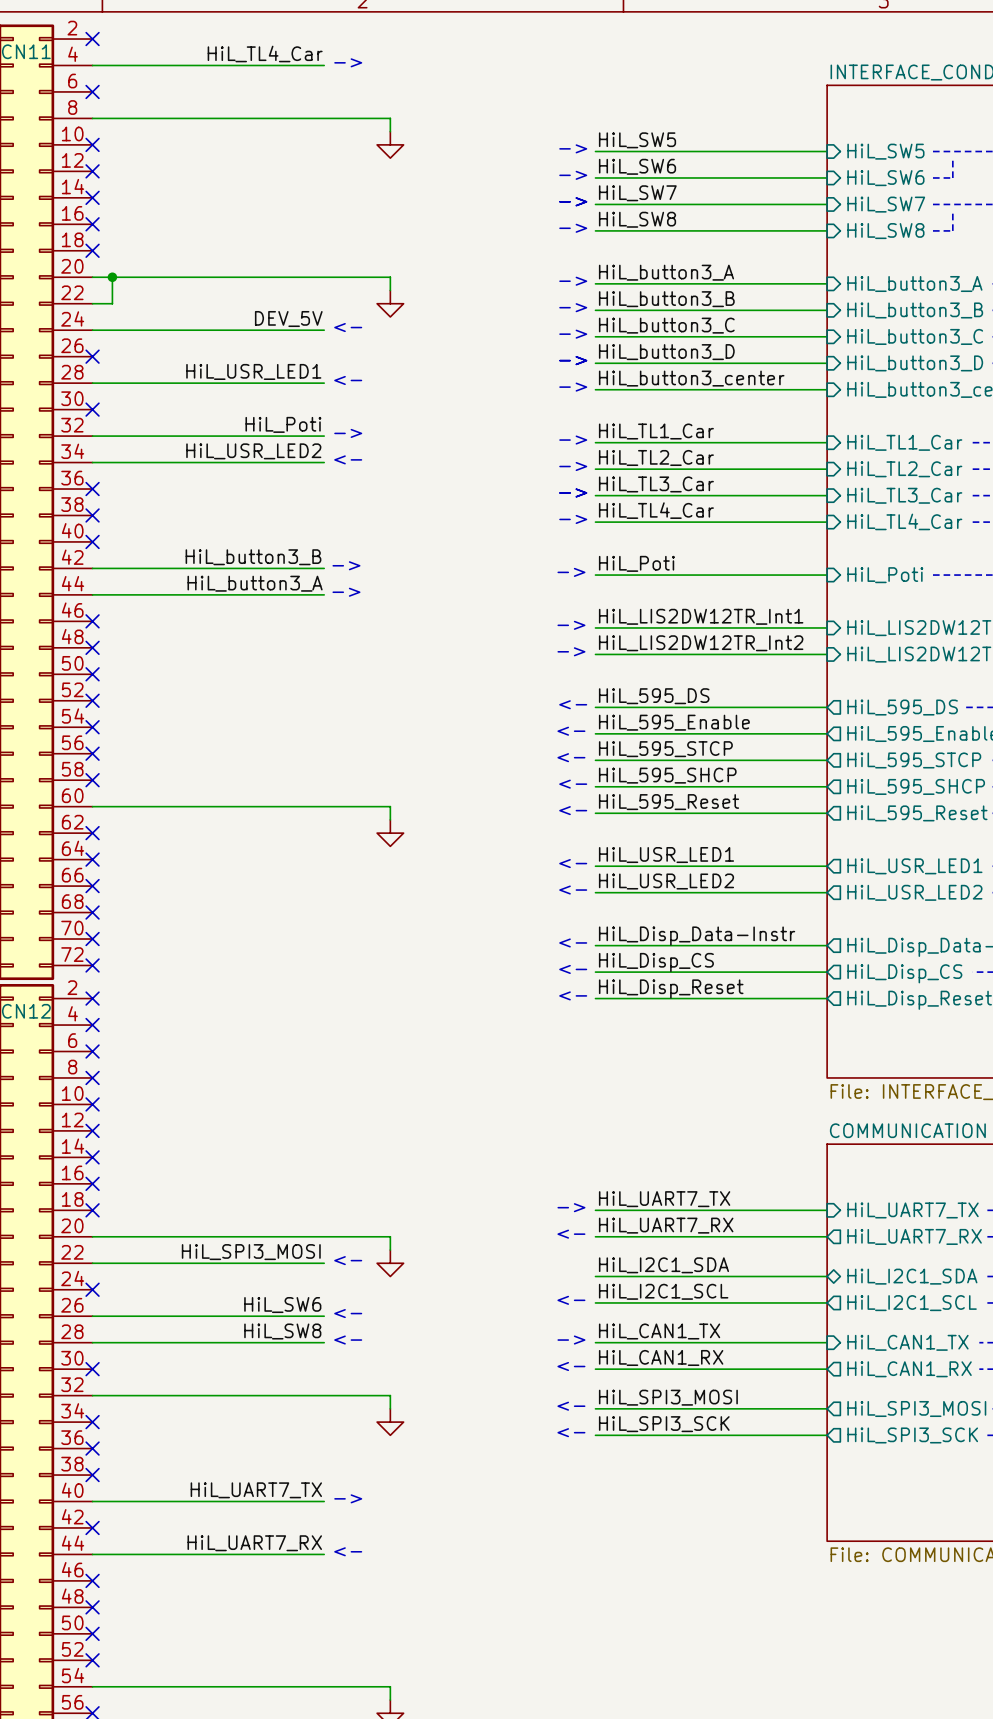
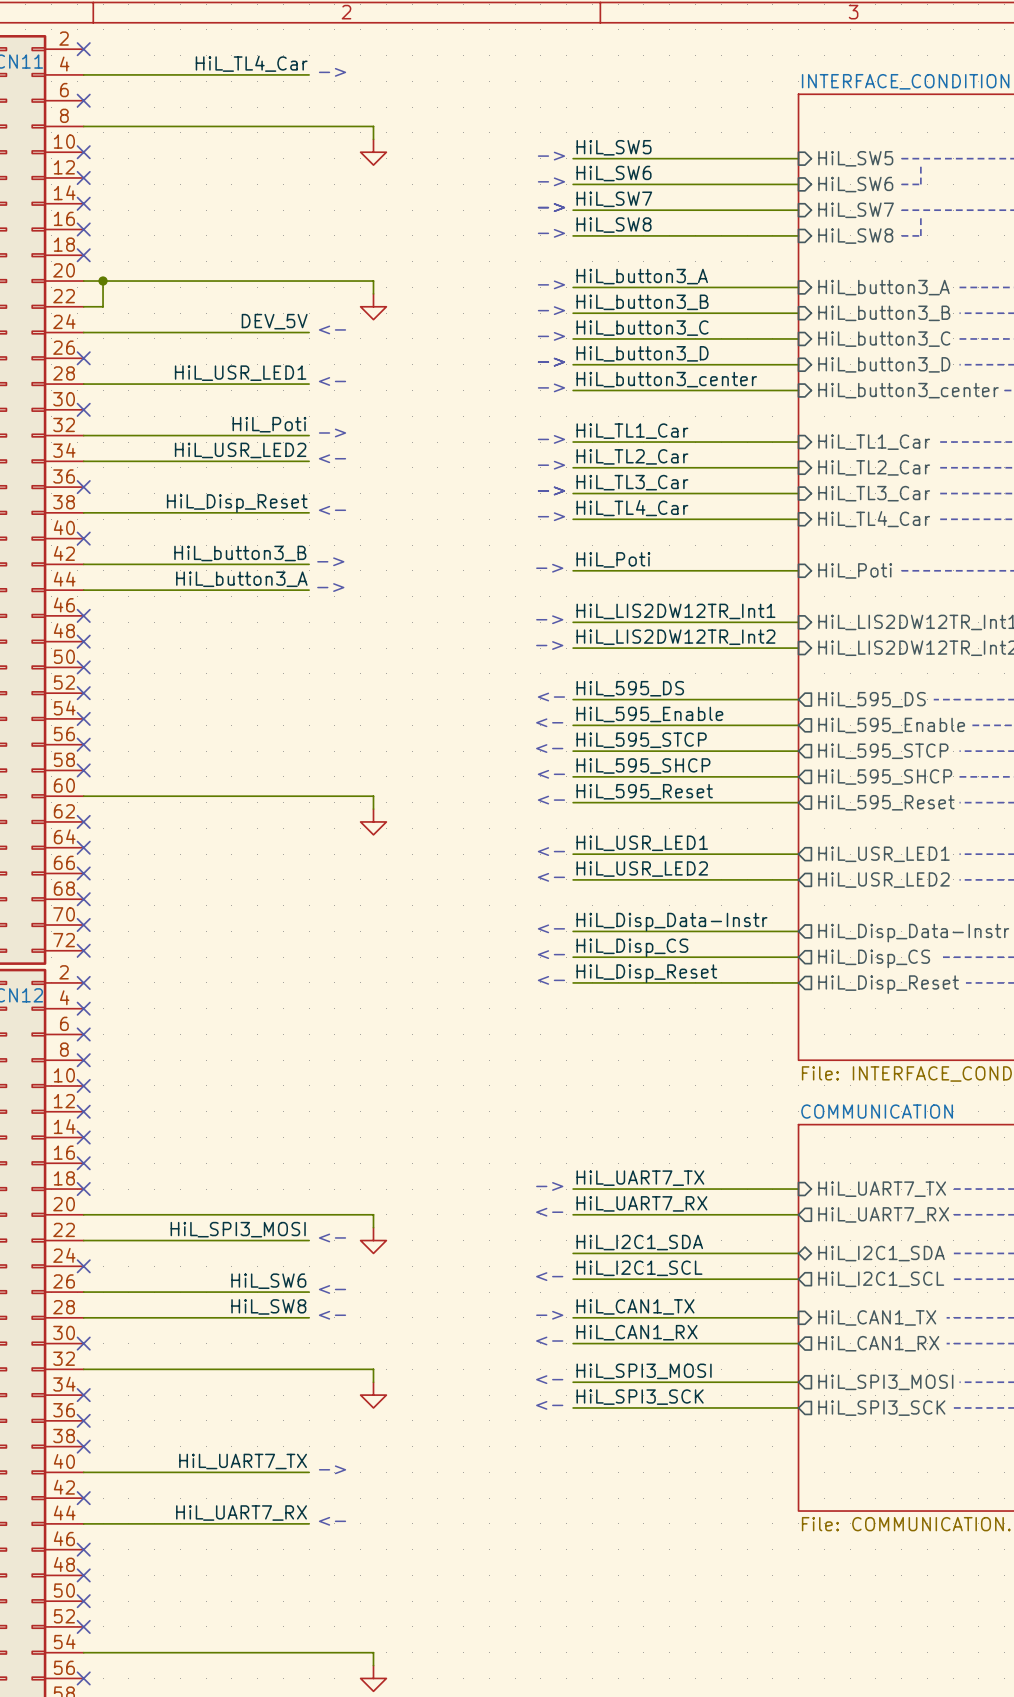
label: none -> HiL_Disp_Reset (237, 503)
text: none -> <- (332, 510)
wire: none -> (83, 512) (309, 512)
no-connect mark: (92, 515) -> none

